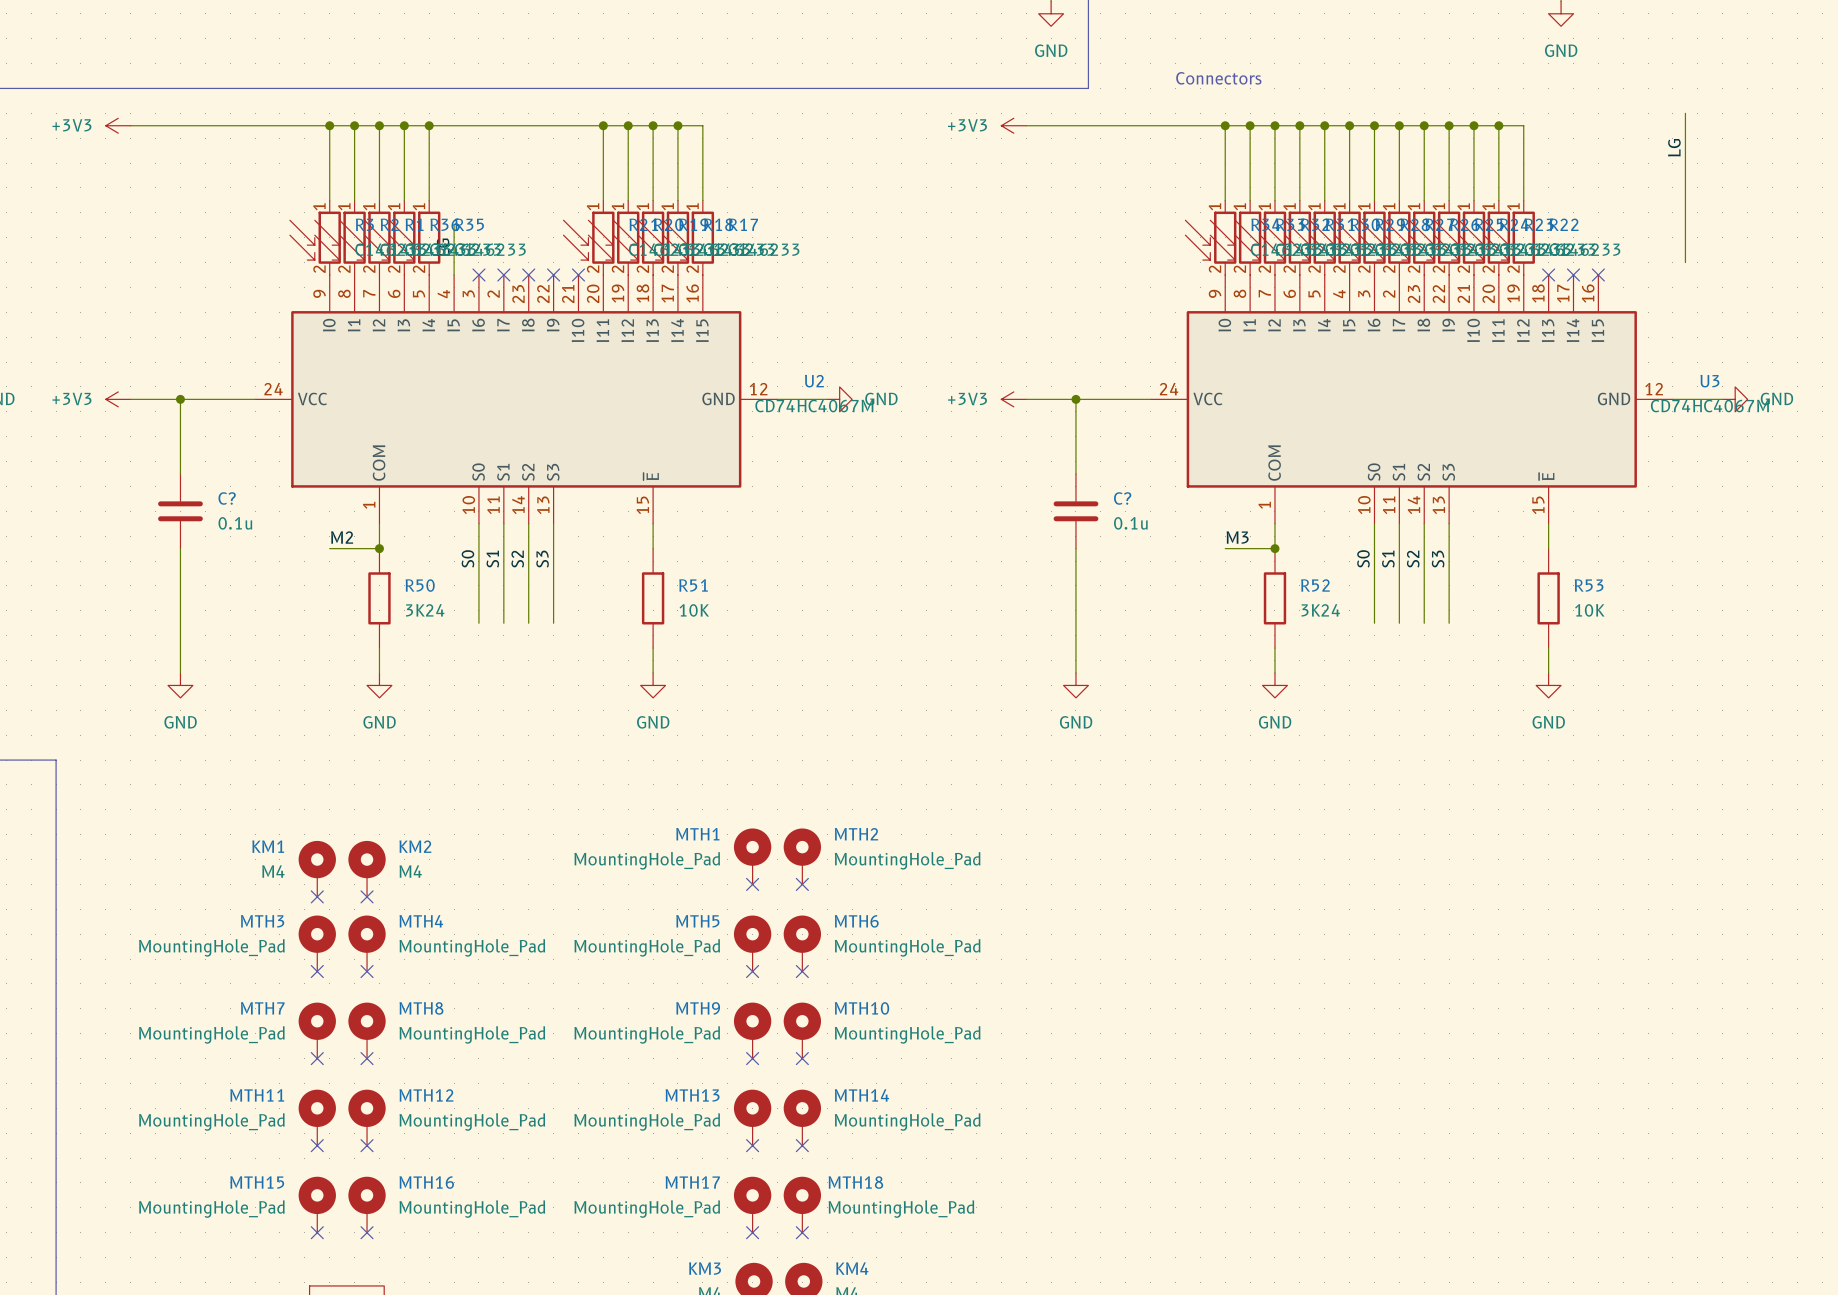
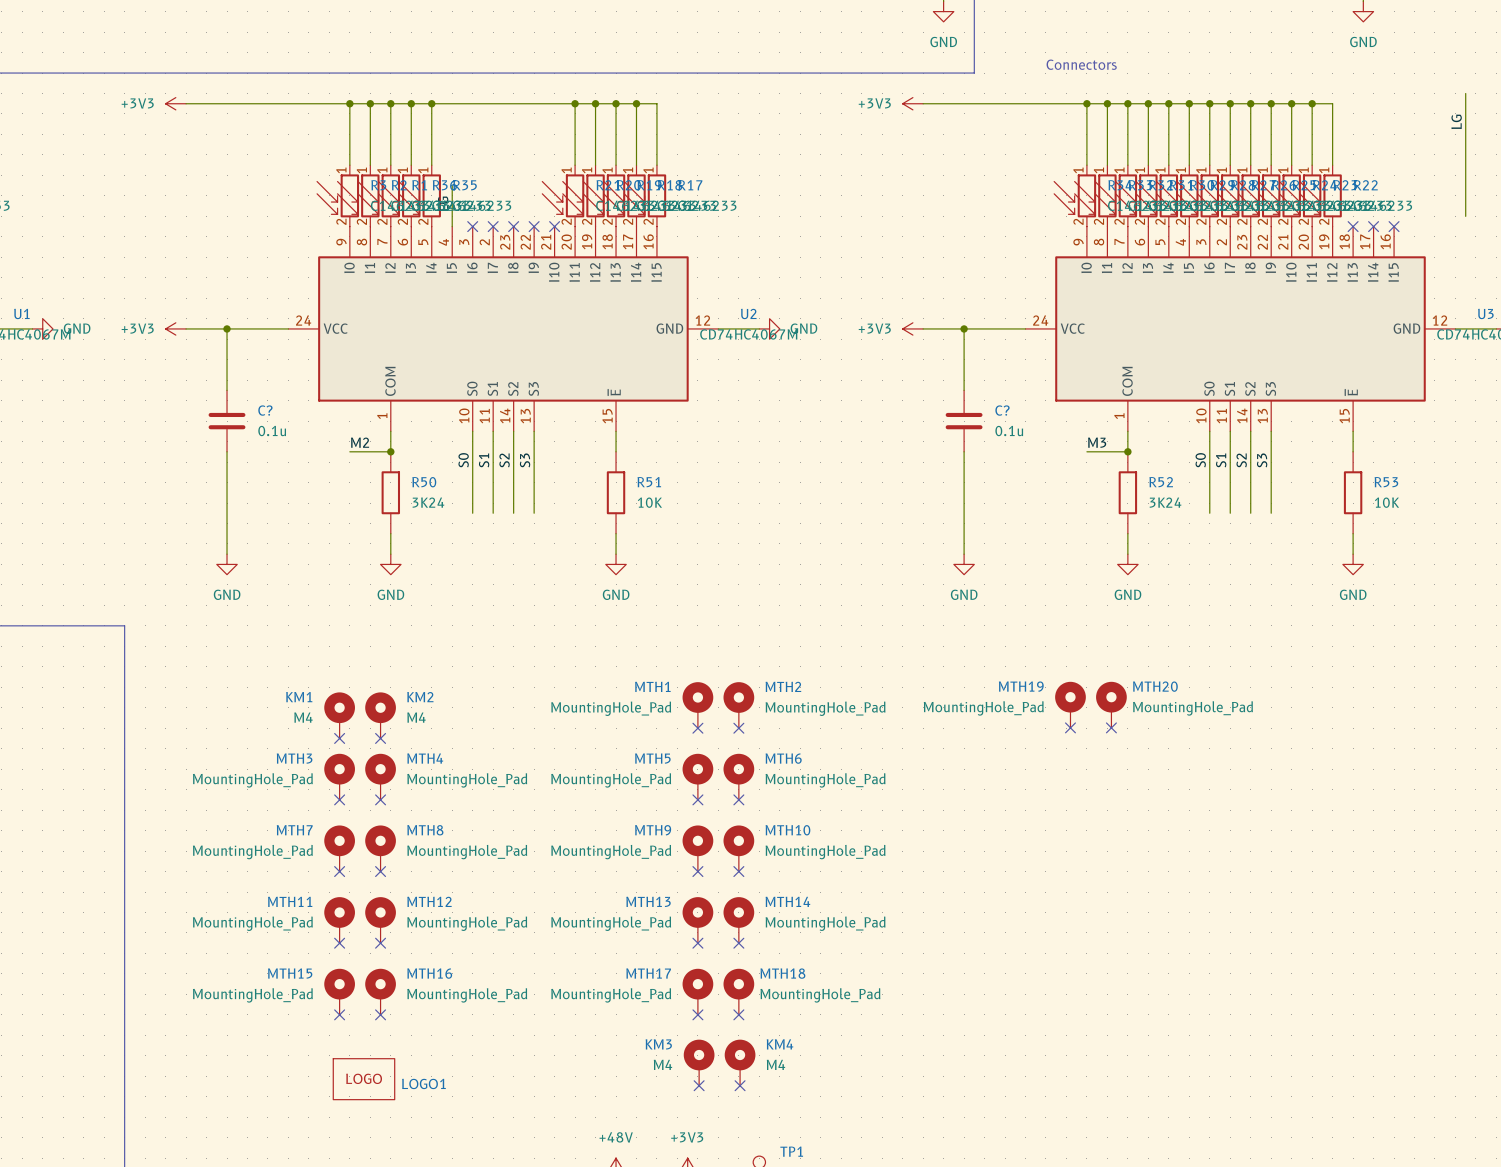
MTH19: none -> MountingHole_Pad (1070, 704)
MTH20: none -> MountingHole_Pad (1111, 704)
no-connect mark: none -> (1070, 727)
no-connect mark: none -> (1111, 727)

